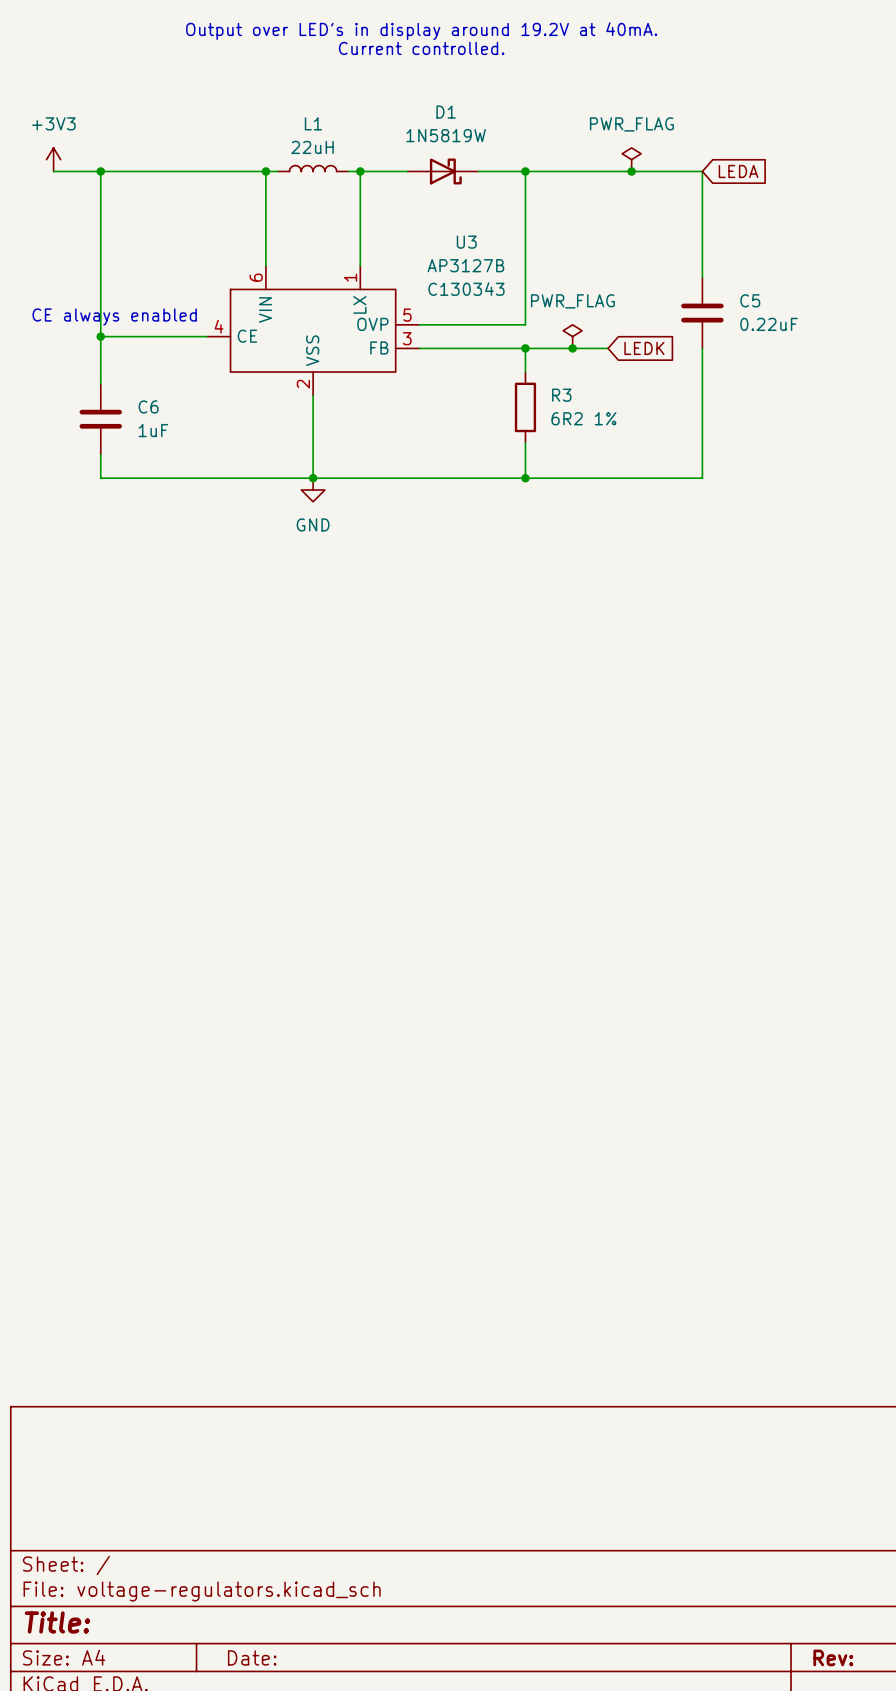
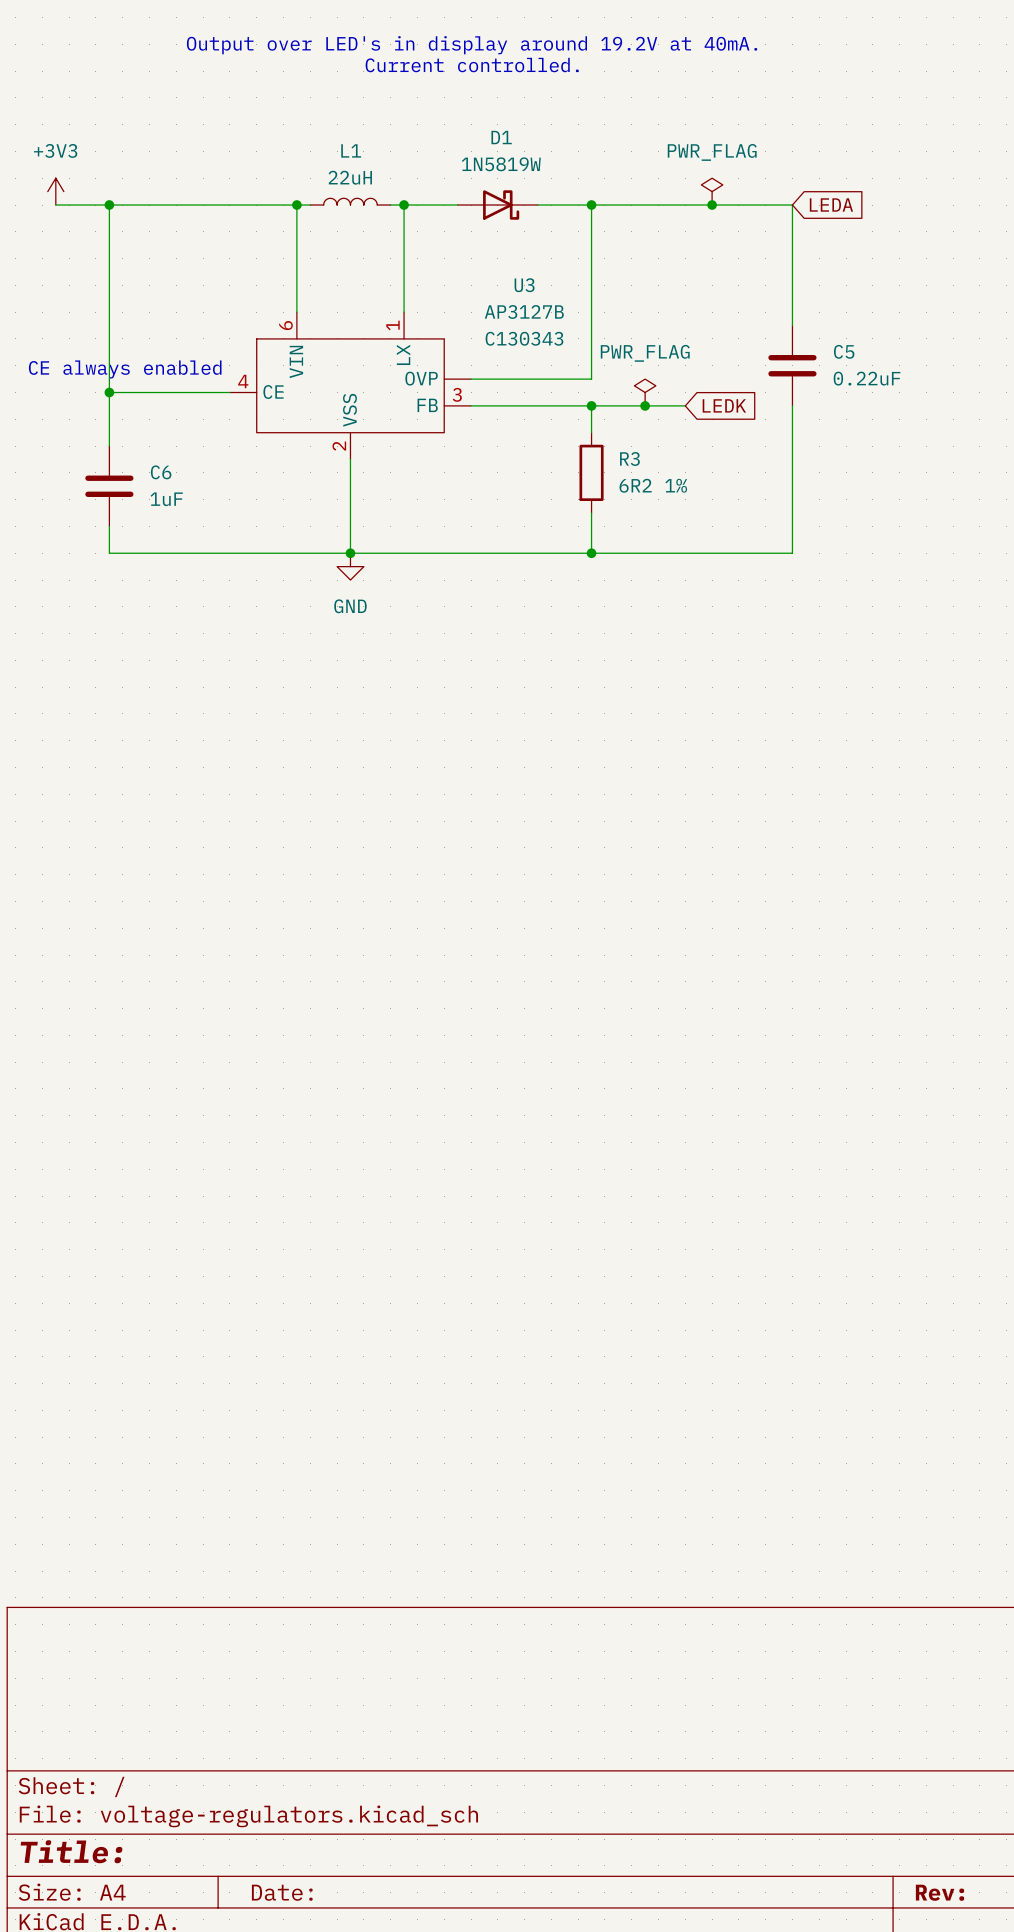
U3 pin number: 5 (407, 315) -> none

